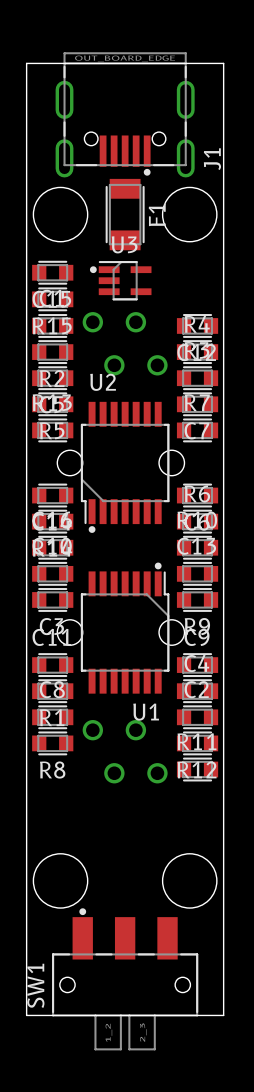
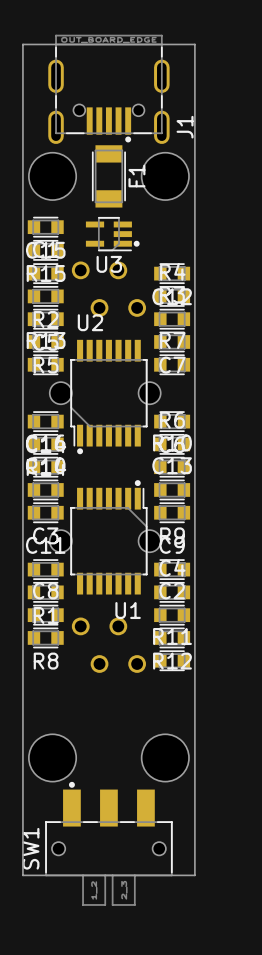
U3 rotation: 0° (120, 280) -> 180° (112, 234)

